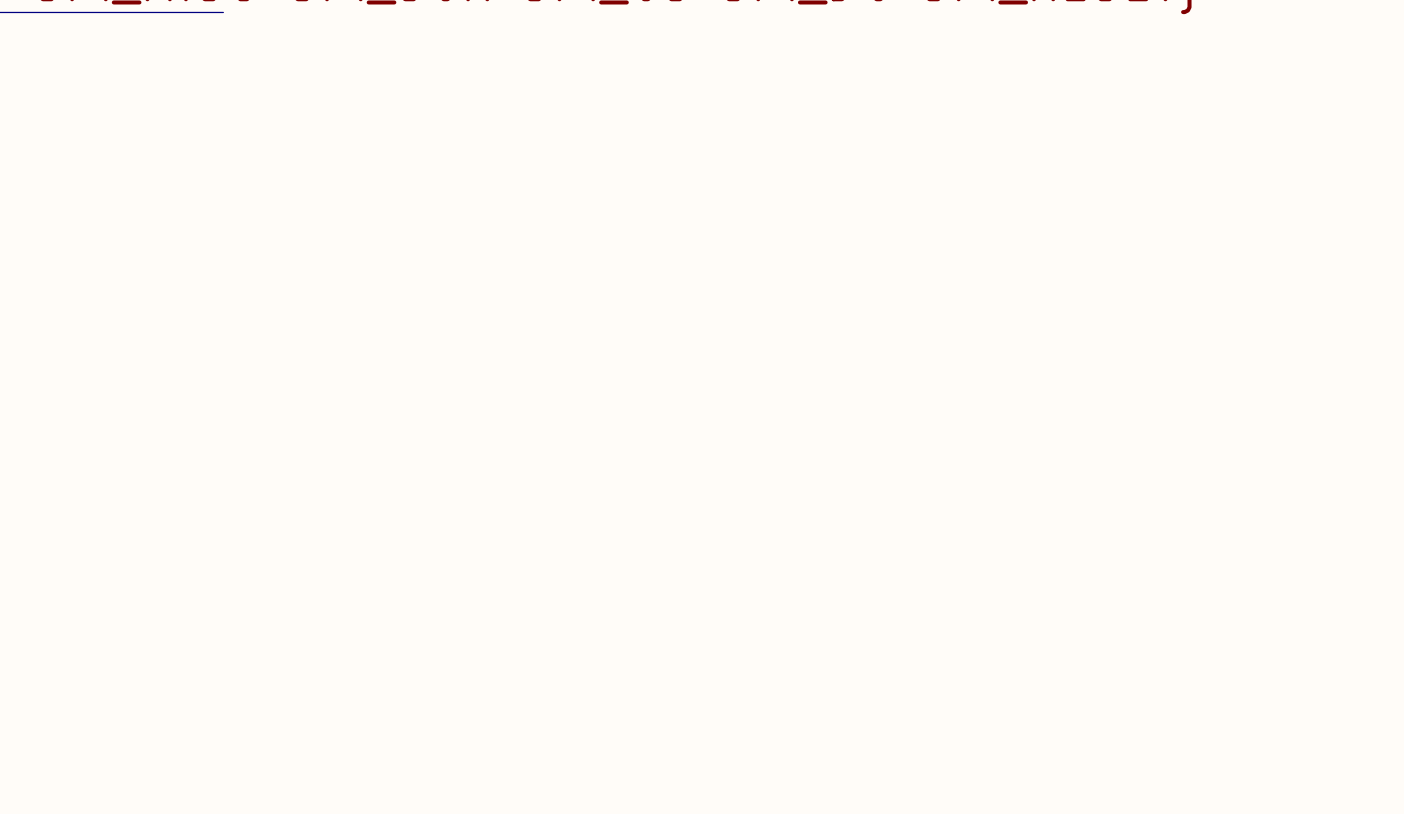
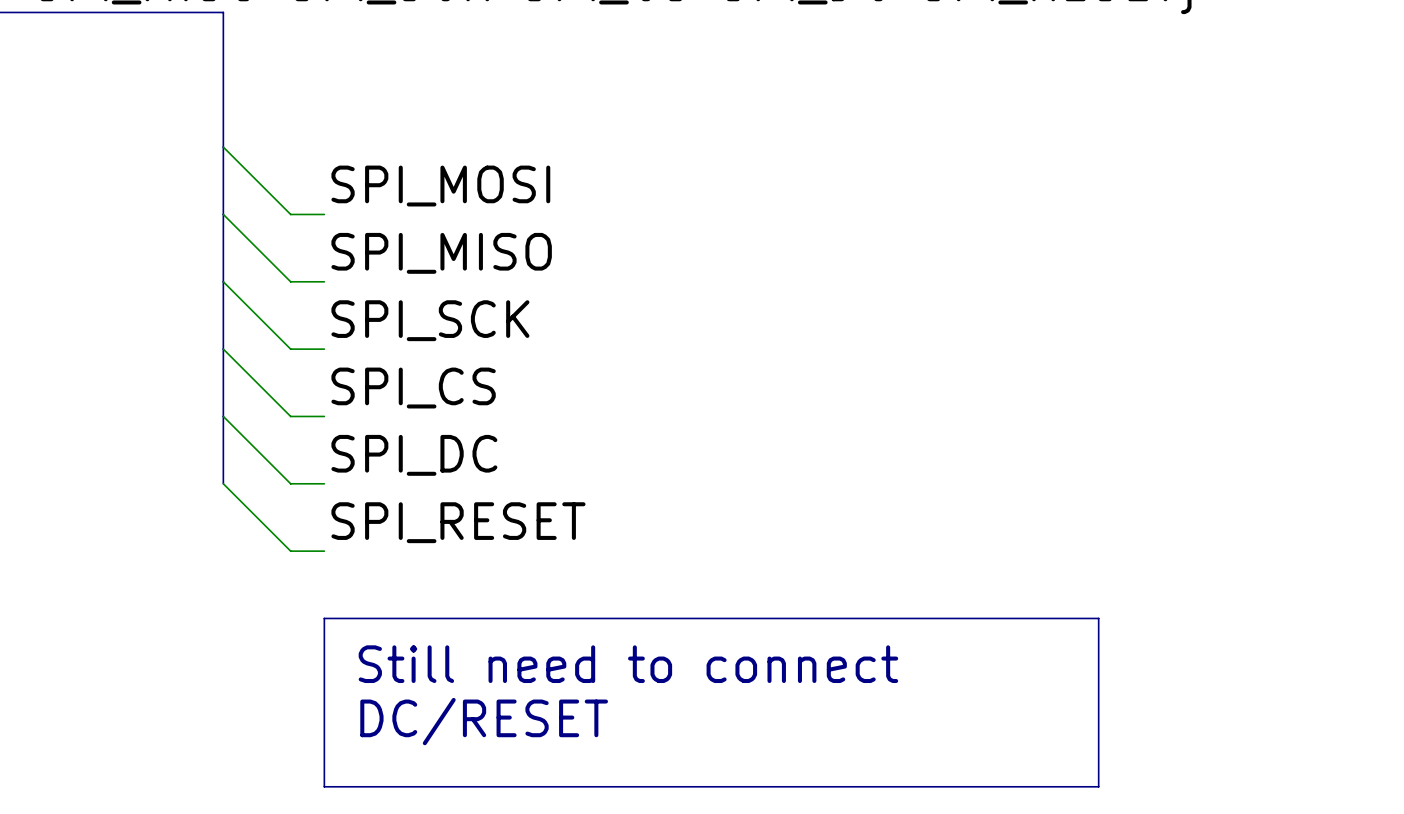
bus: none -> (223, 12) (223, 483)
wire: none -> (223, 147) (290, 214) (324, 214)
label: none -> SPI_MOSI (440, 186)
wire: none -> (223, 214) (290, 281) (324, 281)
label: none -> SPI_MISO (441, 253)
wire: none -> (223, 281) (290, 349) (324, 349)
label: none -> SPI_SCK (430, 320)
wire: none -> (223, 349) (290, 416) (324, 416)
label: none -> SPI_CS (413, 388)
wire: none -> (223, 416) (290, 483) (324, 483)
label: none -> SPI_DC (414, 455)
wire: none -> (223, 483) (290, 551) (324, 551)
label: none -> SPI_RESET (458, 522)
line: none -> (324, 618) (1098, 618) (1098, 786) (324, 786) (324, 618)
text: none -> Still need to connect (628, 664)
text: none -> DC/RESET (484, 721)

